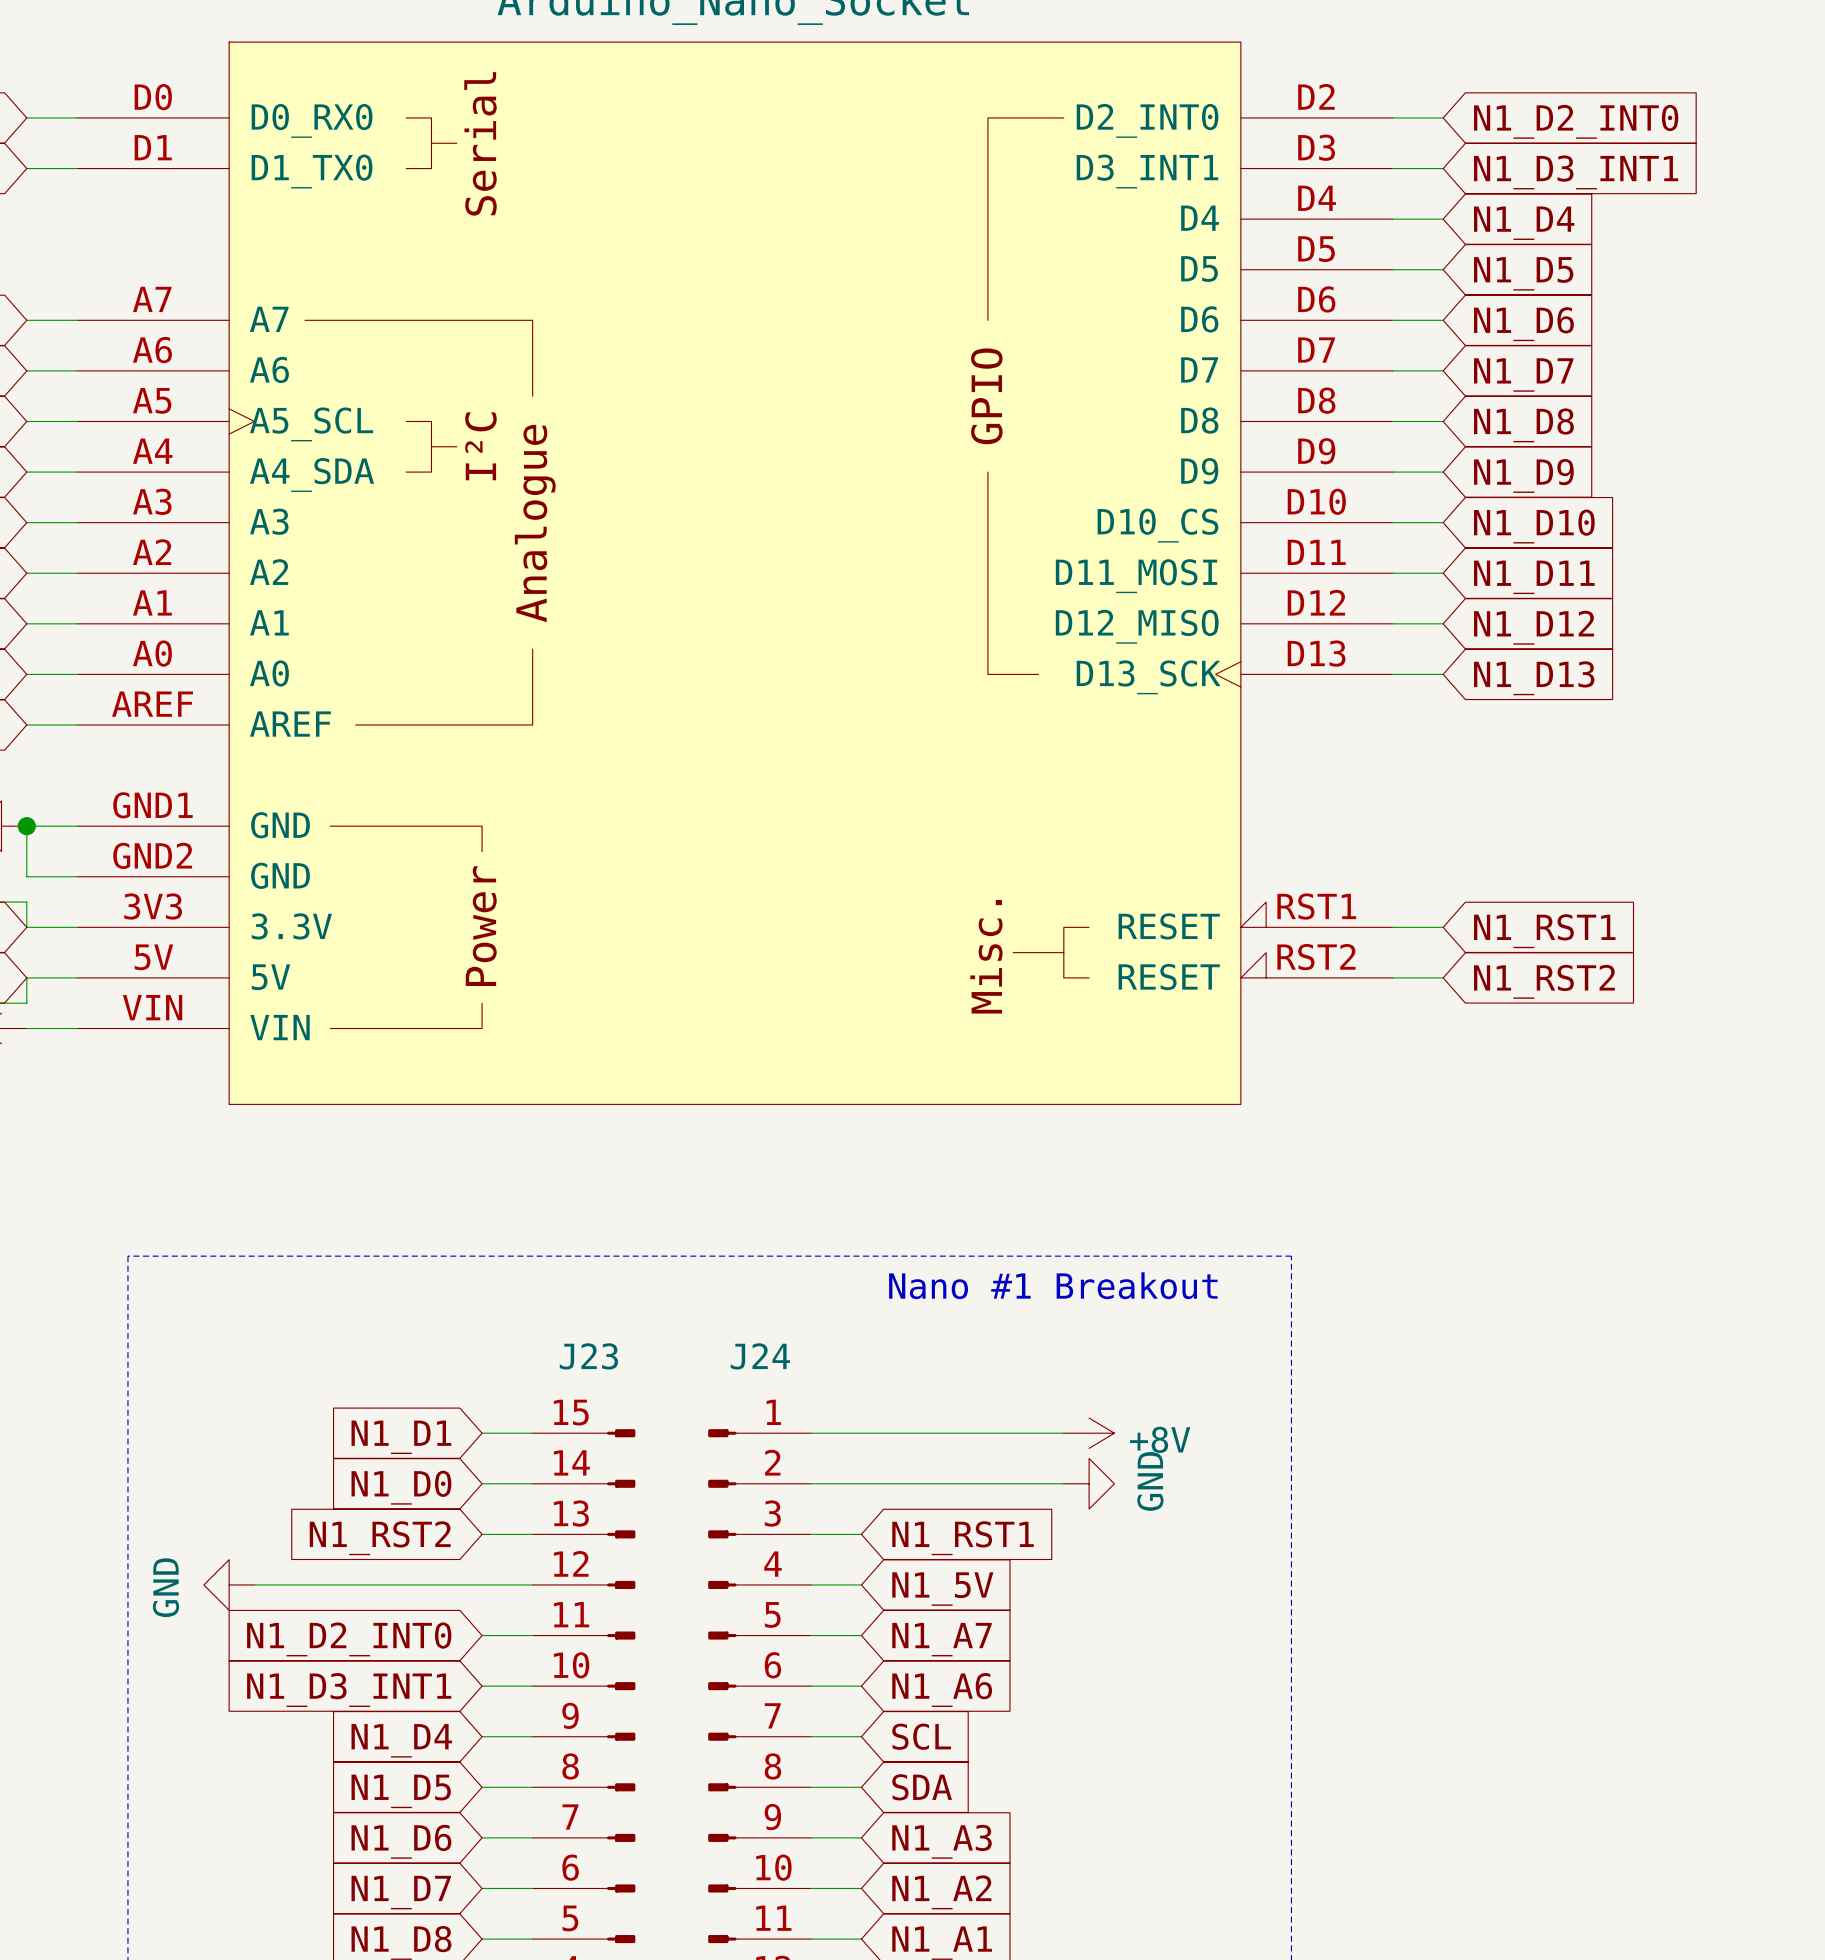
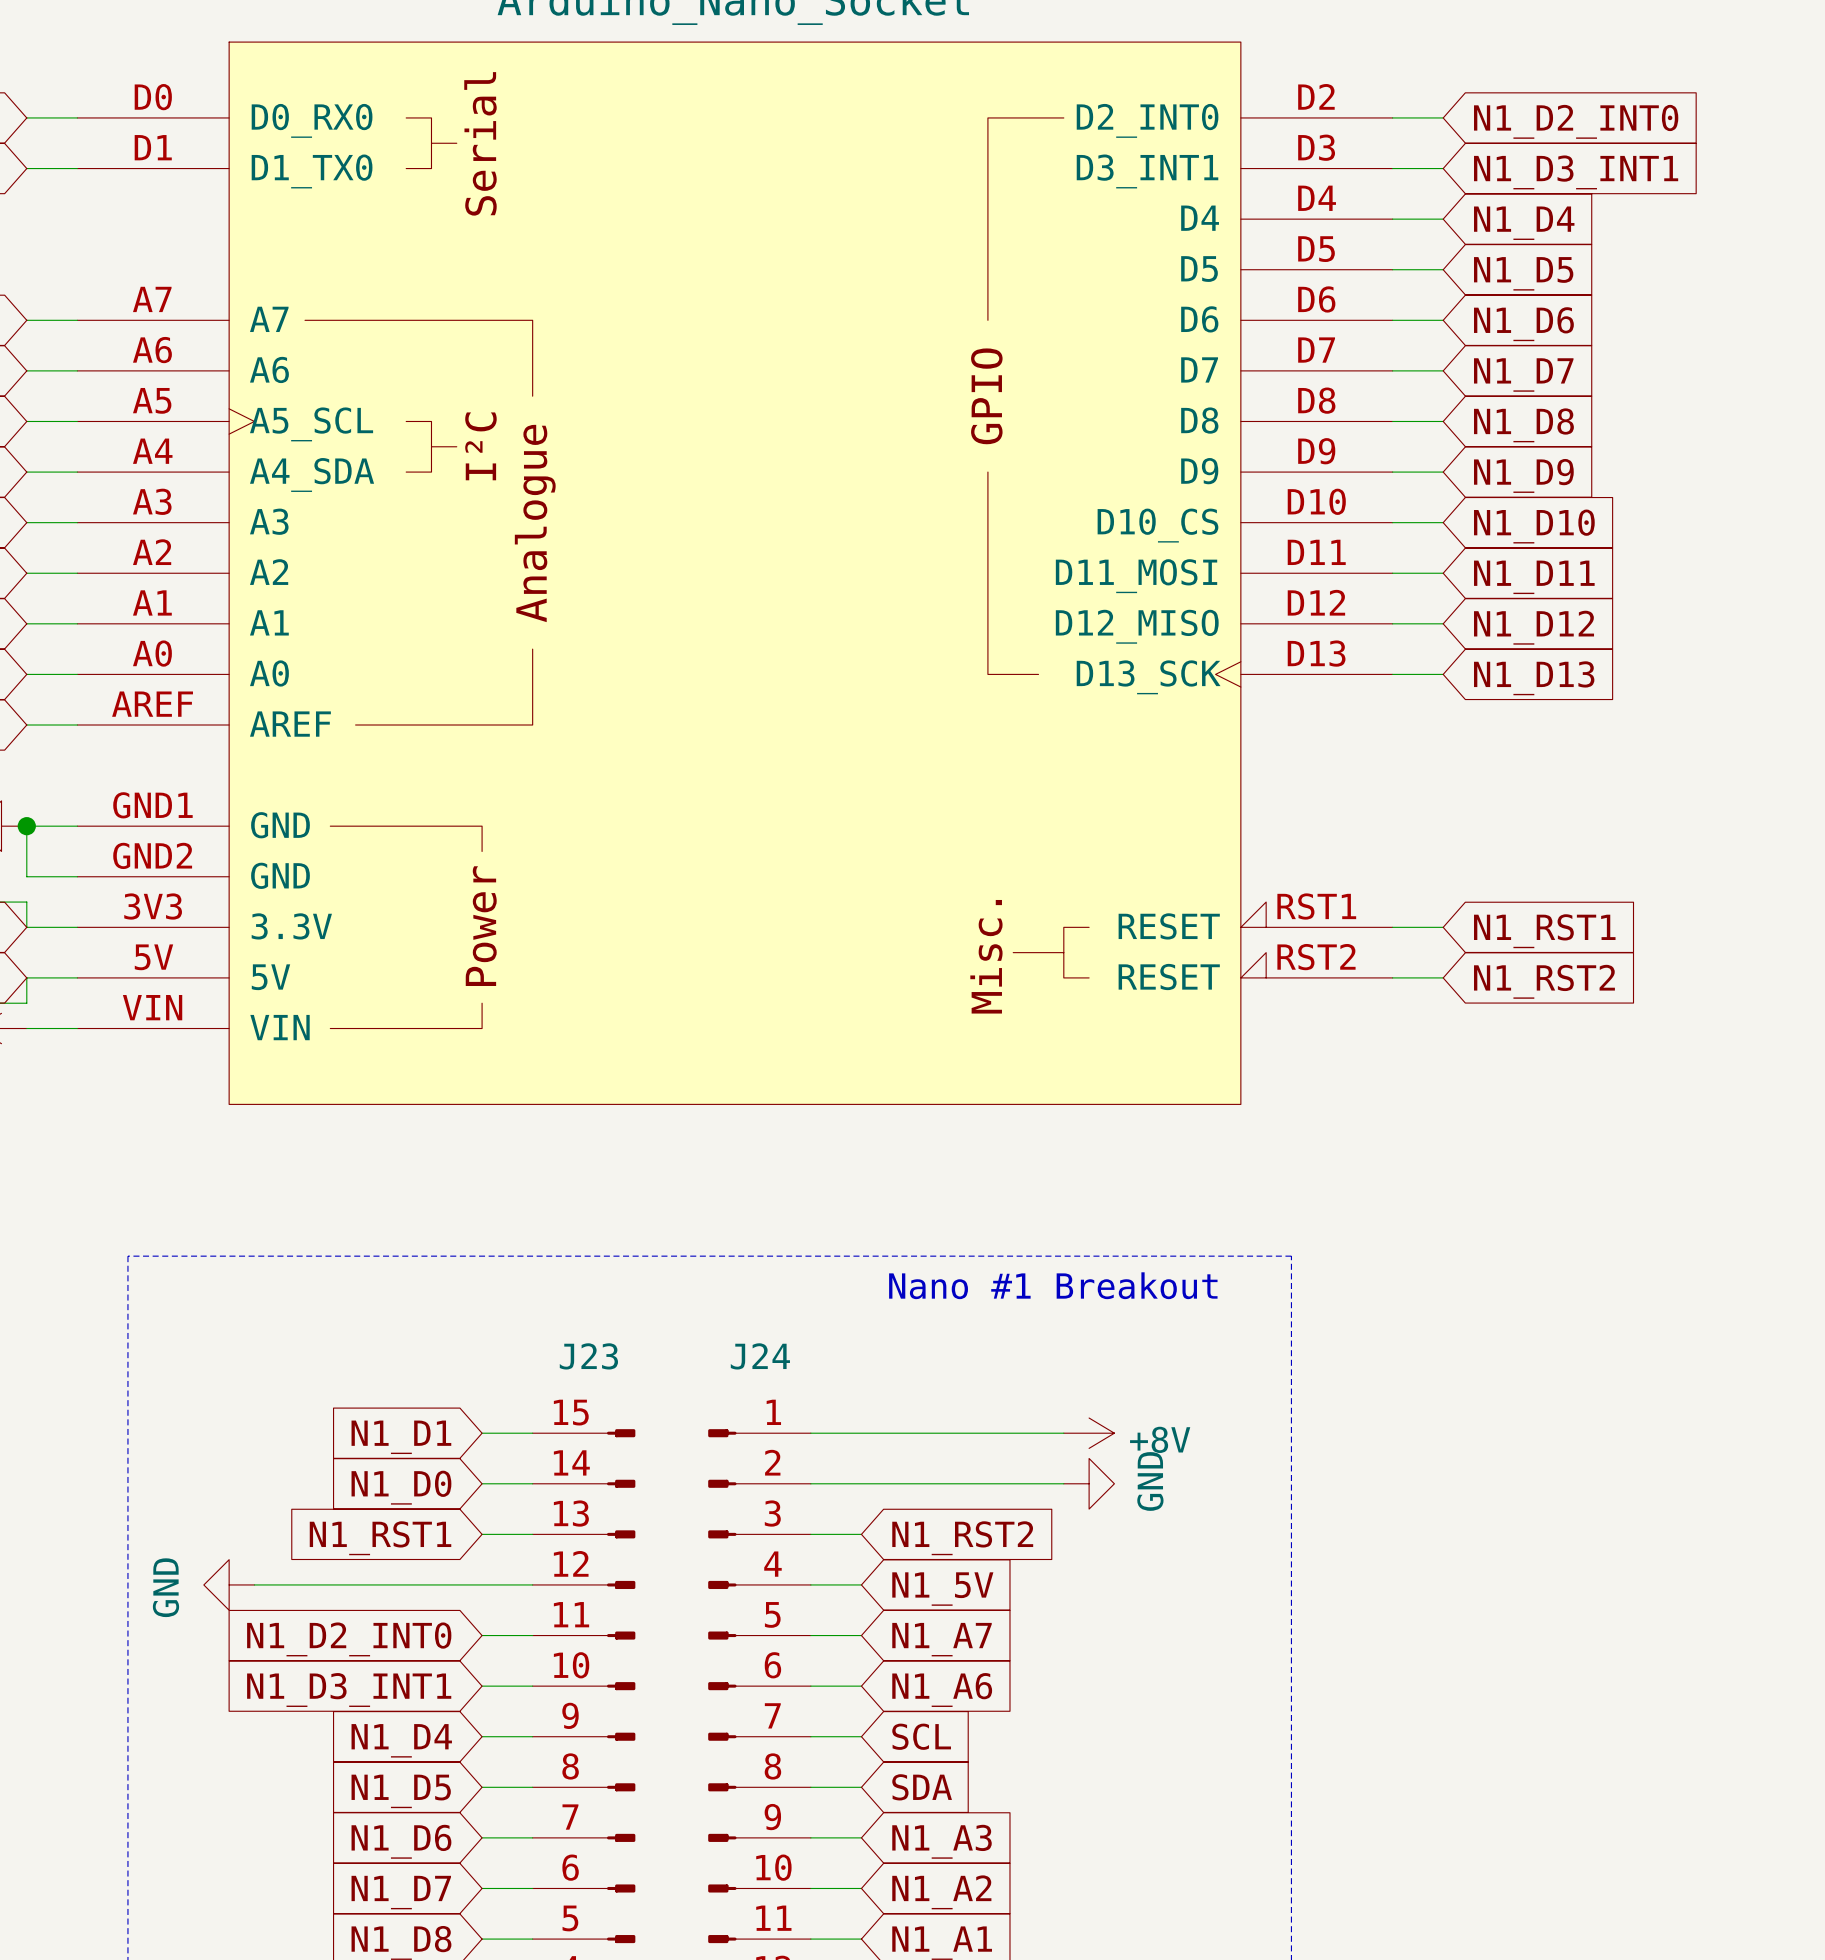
global label: N1_RST2 (380, 1538) -> N1_RST1 (380, 1538)
global label: N1_RST1 (963, 1538) -> N1_RST2 (962, 1538)

